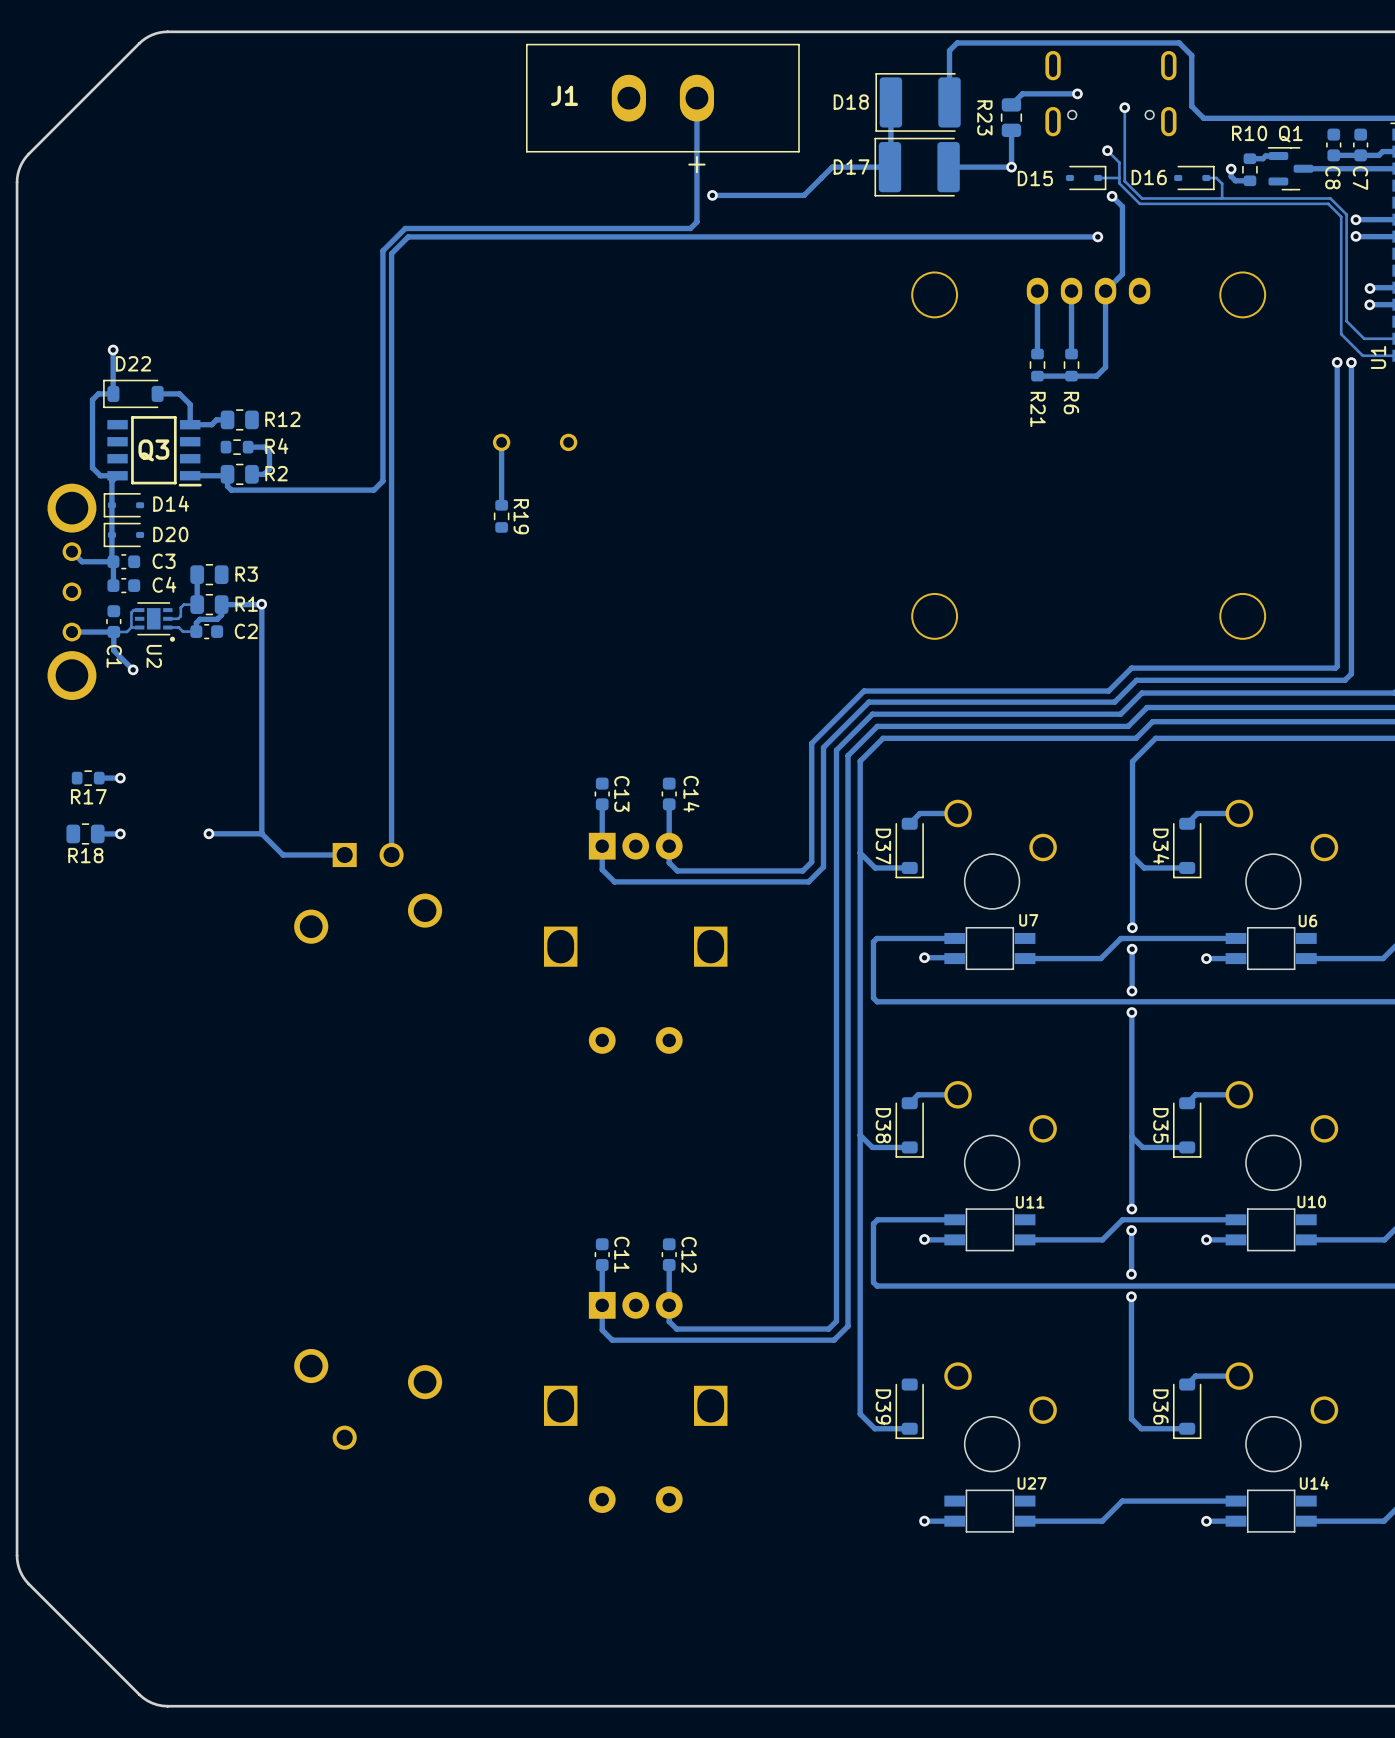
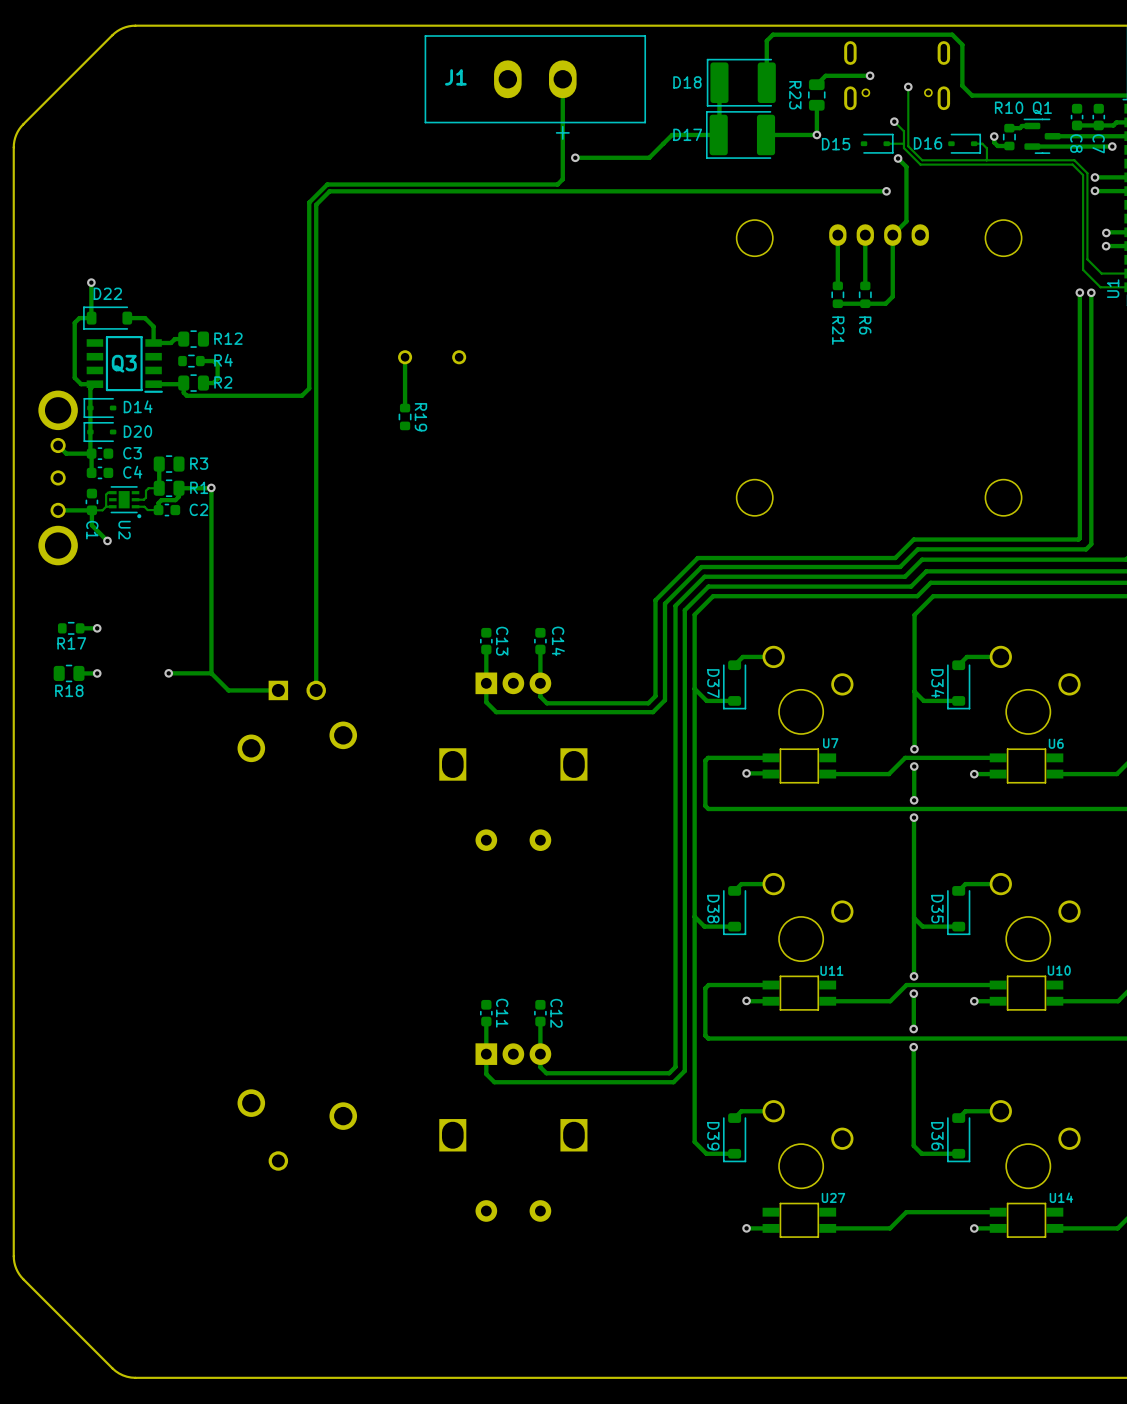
track: none -> (1112, 146) (1032, 146)
via: none -> (1112, 146)
track: none -> (773, 1111) (741, 1111) (734, 1118)

